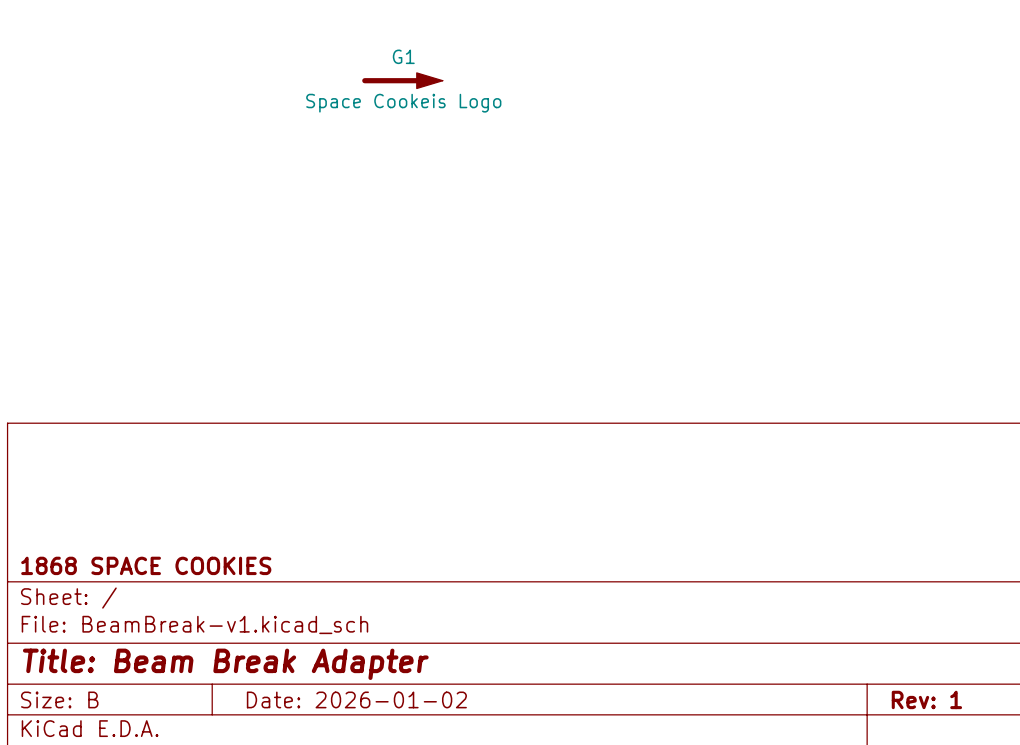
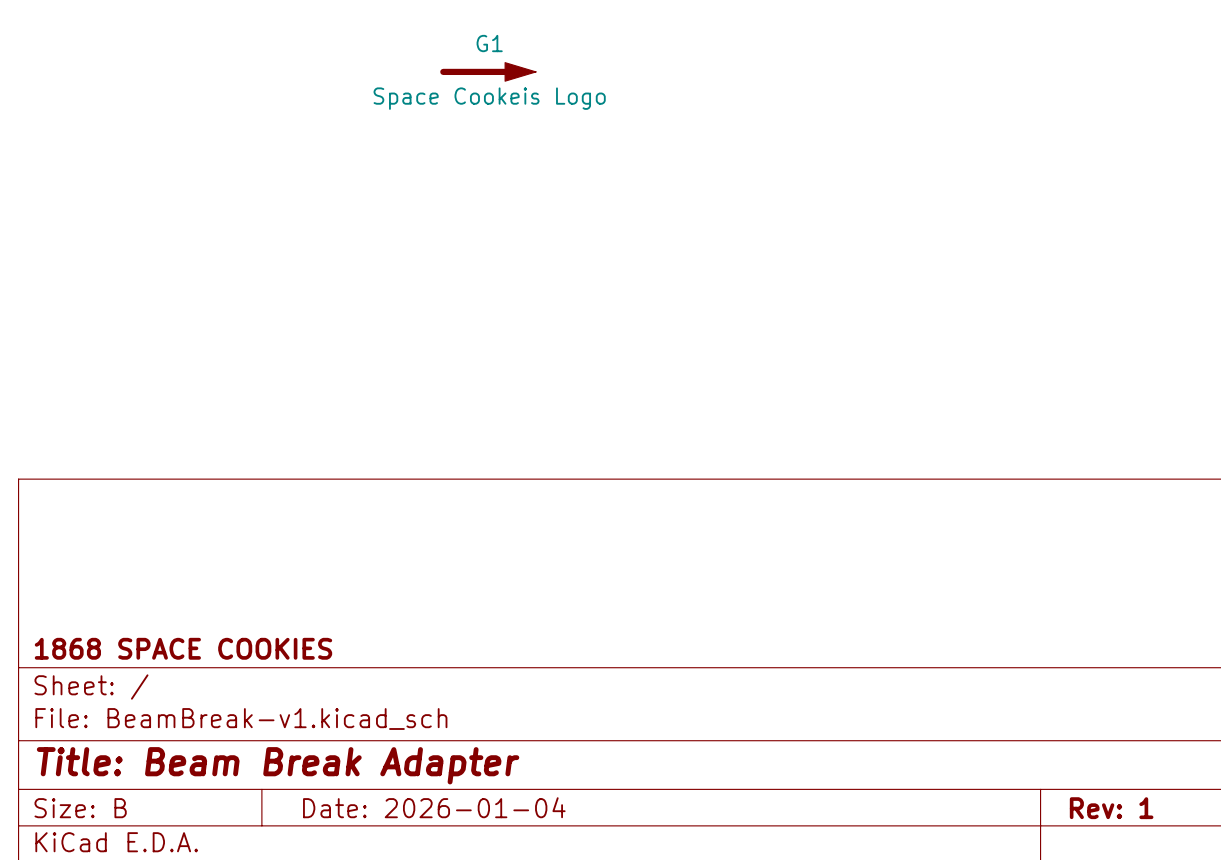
title block: Date: 2026-01-02 (356, 699) -> Date: 2026-01-04 (434, 807)

